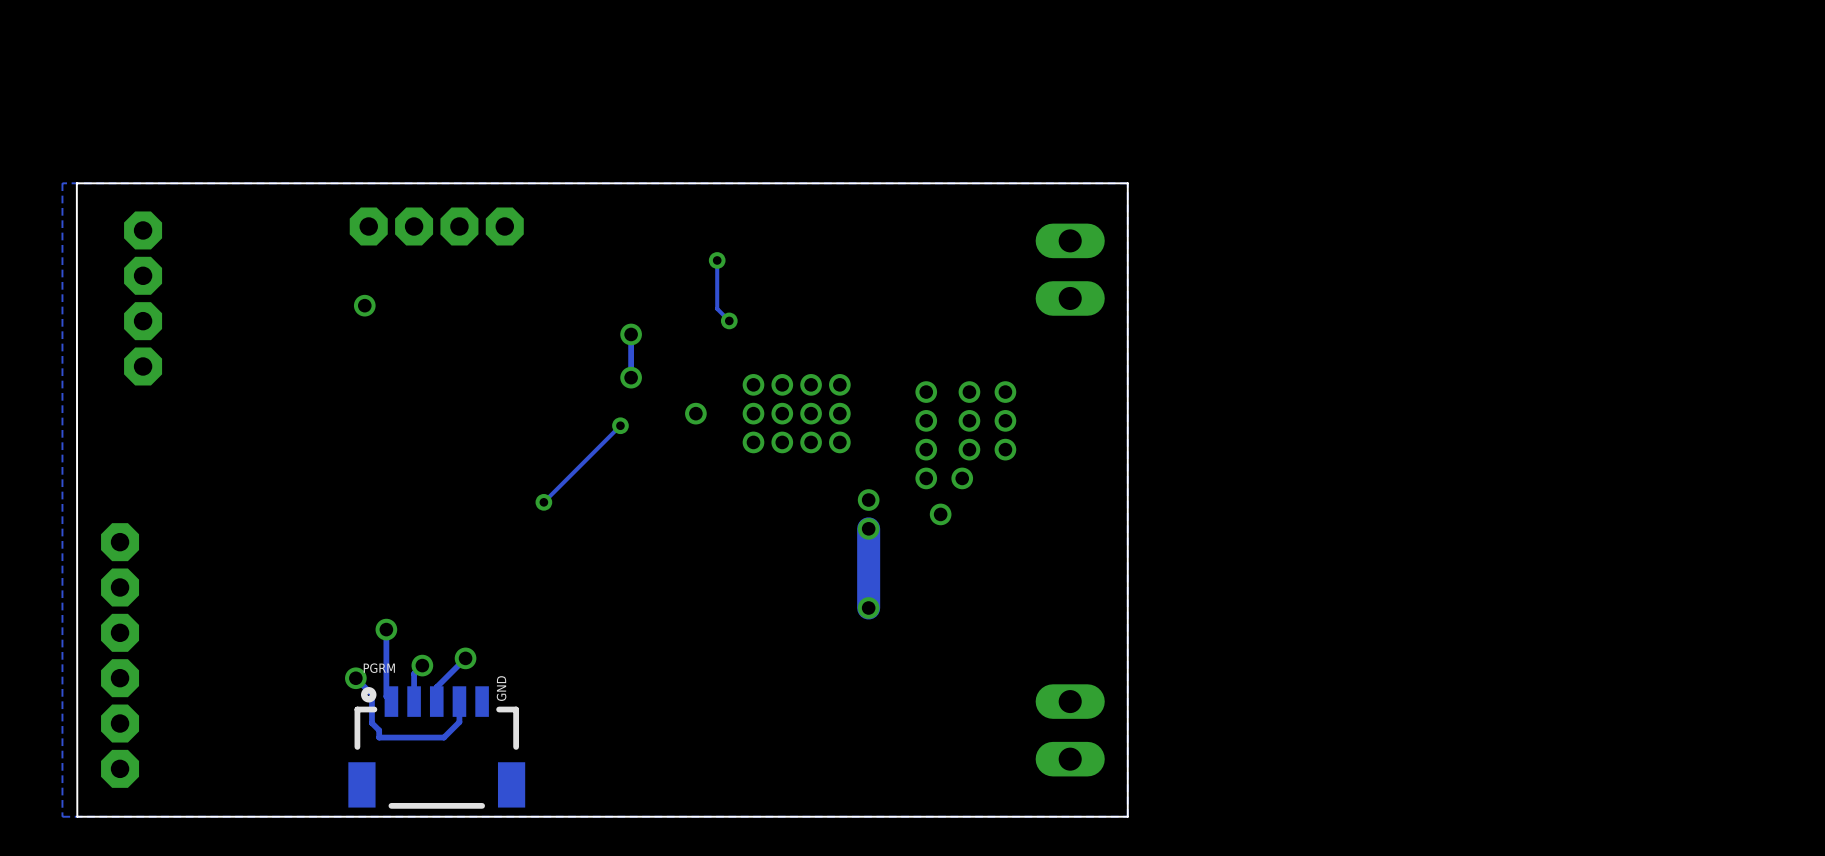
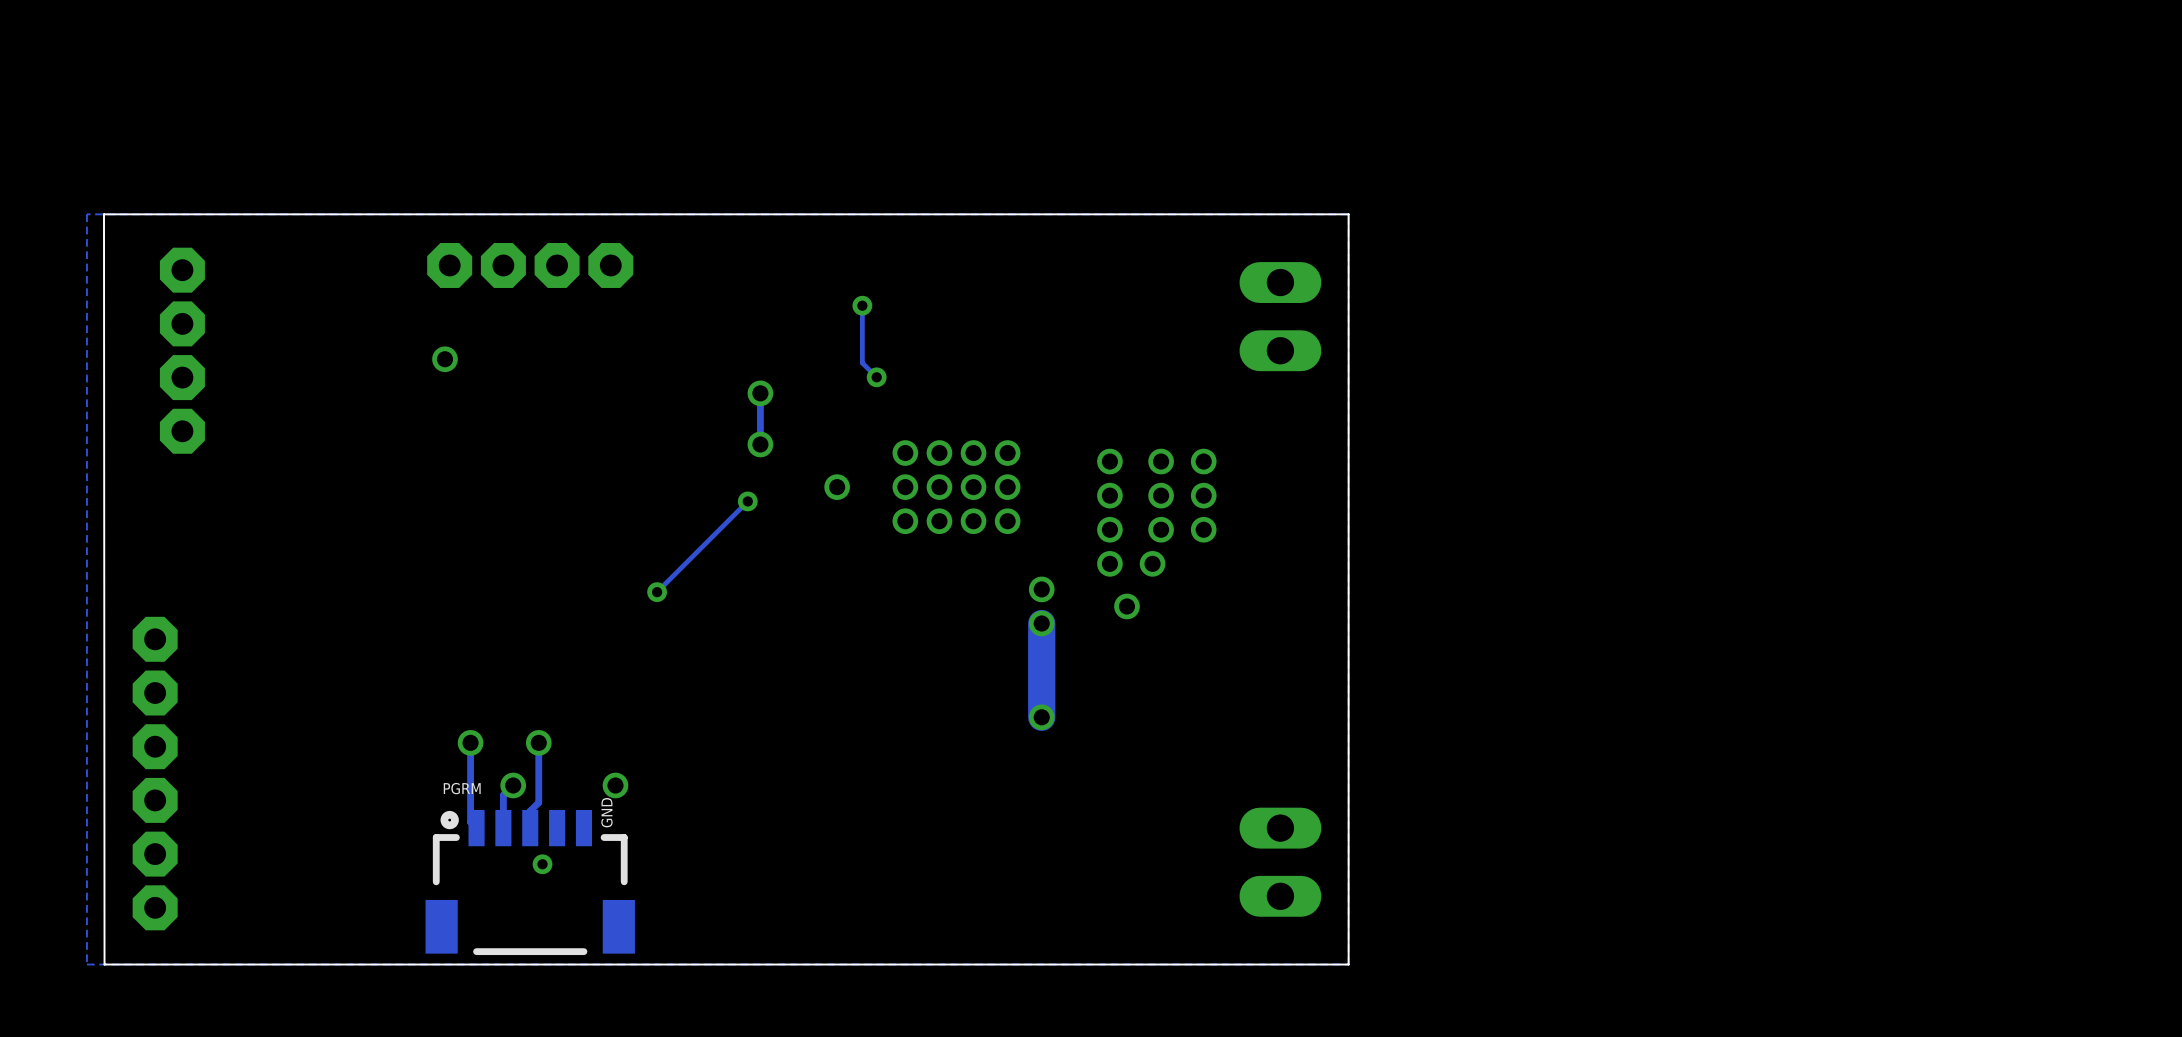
via: none -> (538, 742)
track: (465, 658) (443, 679) -> (538, 742) (538, 802)
via: (465, 658) -> none
via: none -> (615, 785)
track: (355, 678) (371, 694) (371, 723) (379, 730) (379, 737) (443, 737) (459, 722) (459, 701) -> none
via: (355, 678) -> none
via: none -> (542, 864)

